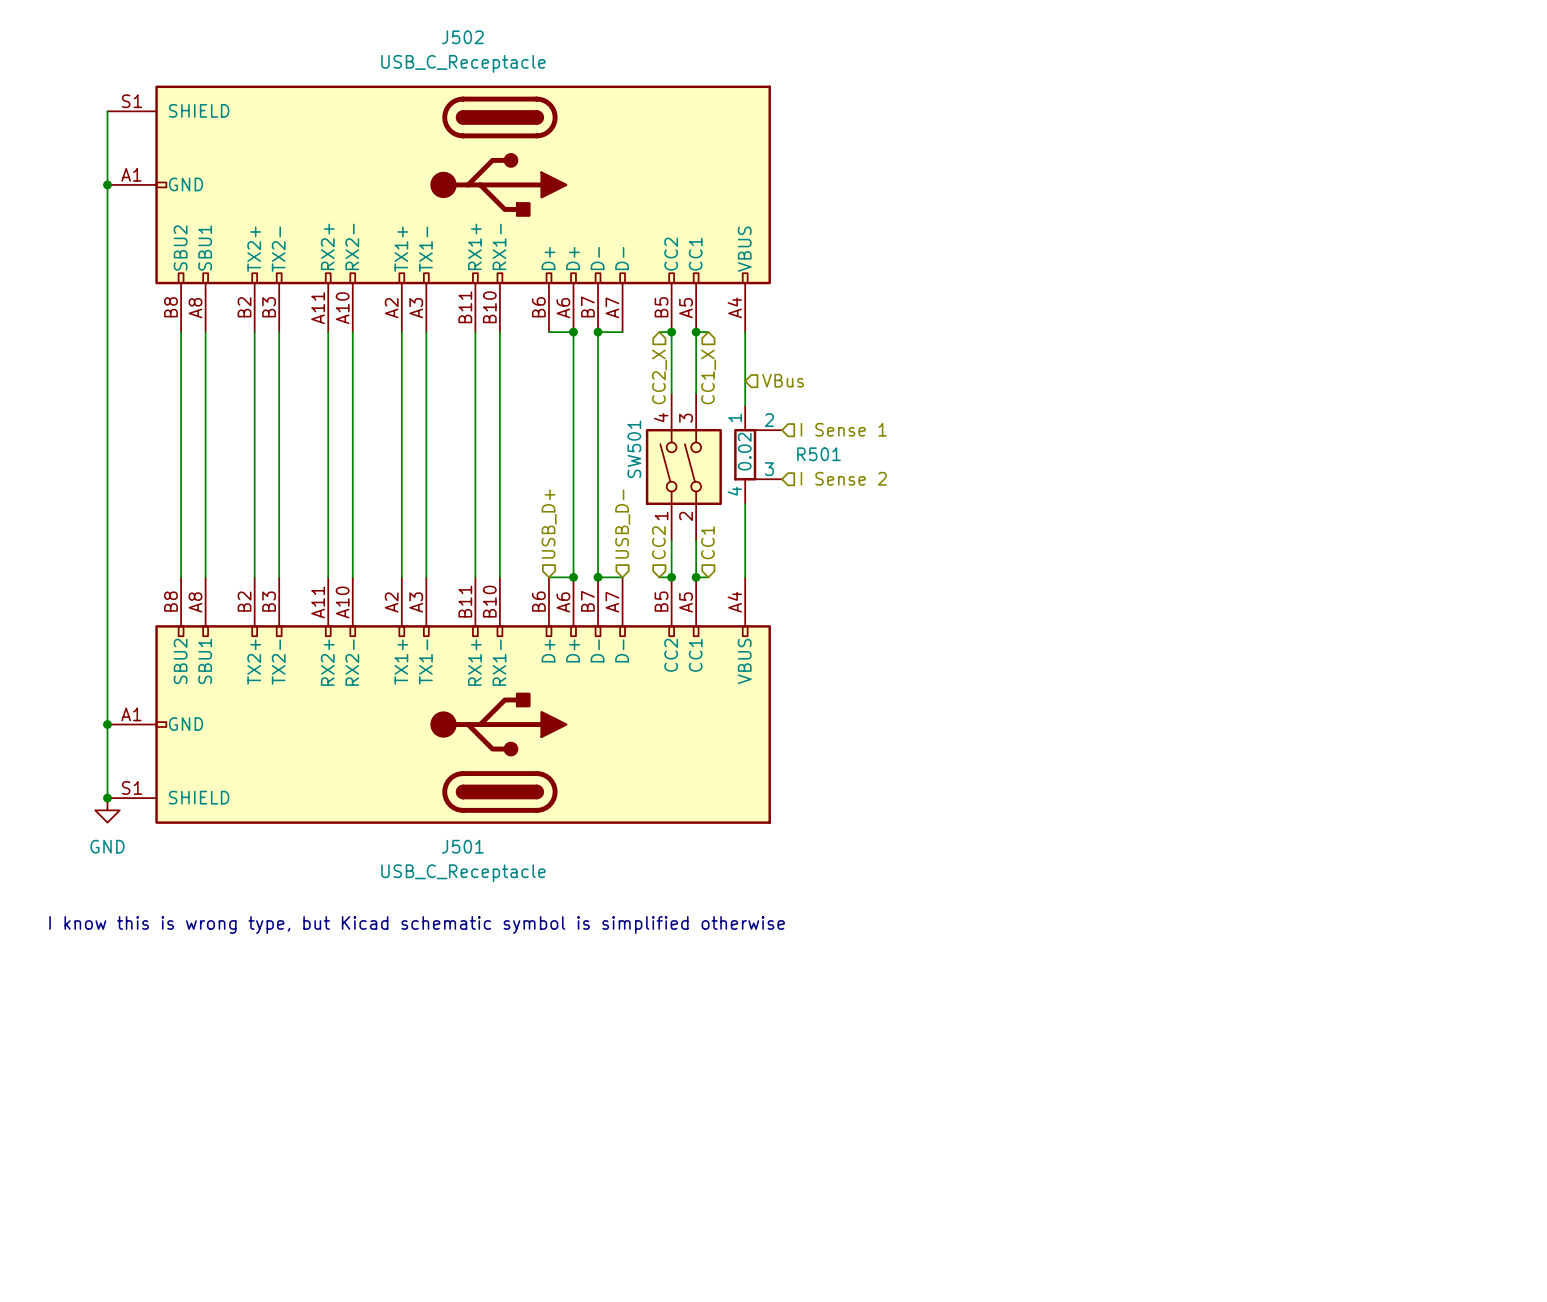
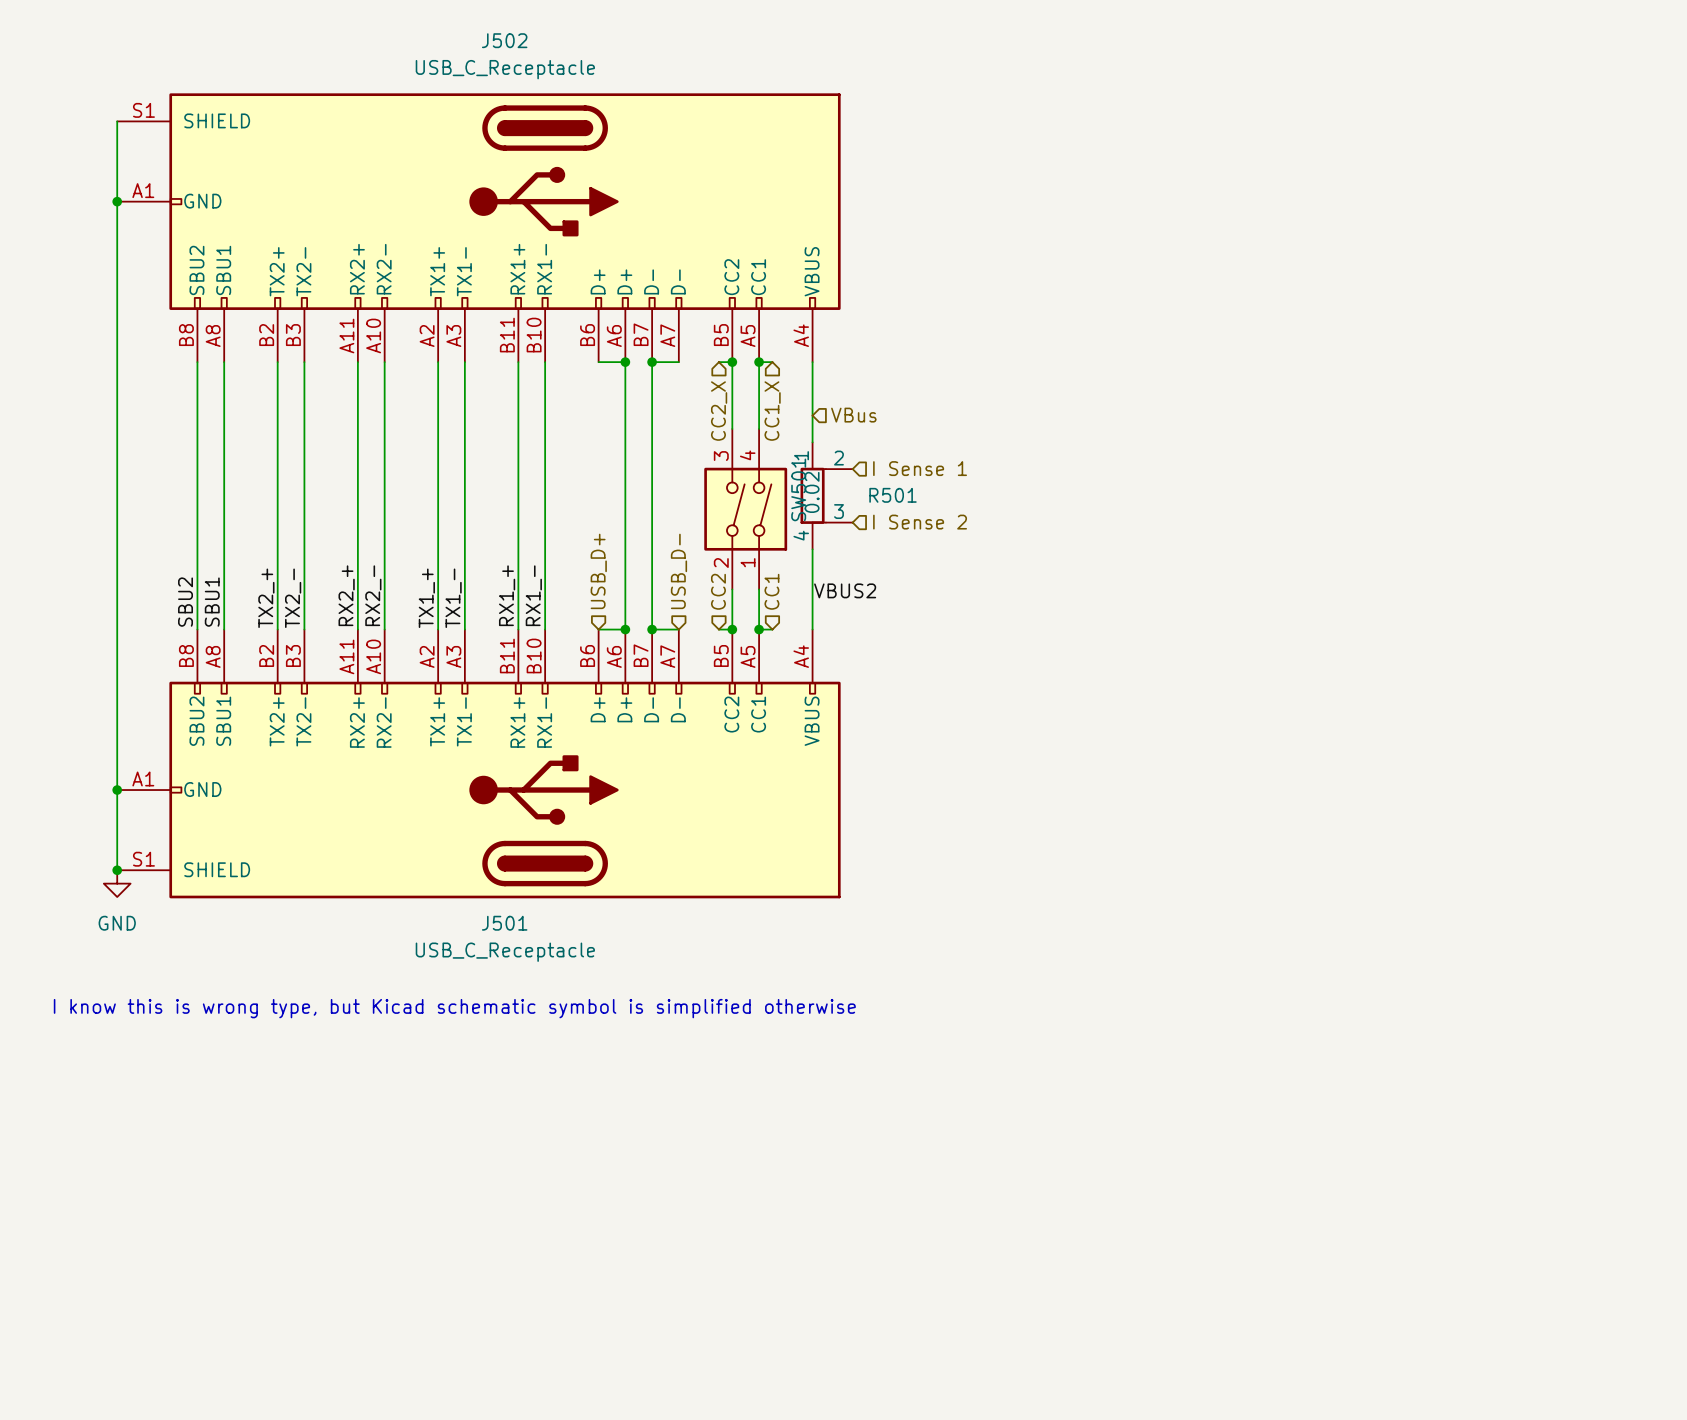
SW501 flip: as is (683, 466) -> left-right (745, 509)
label: none -> VBUS2 (845, 590)
label: none -> RX2_+ (346, 595)
label: none -> RX2_- (373, 595)
label: none -> RX1_+ (507, 595)
label: none -> RX1_- (533, 595)
label: none -> TX2_+ (266, 598)
label: none -> TX2_- (293, 598)
label: none -> TX1_+ (426, 598)
label: none -> TX1_- (453, 598)
label: none -> SBU2 (185, 602)
label: none -> SBU1 (212, 602)

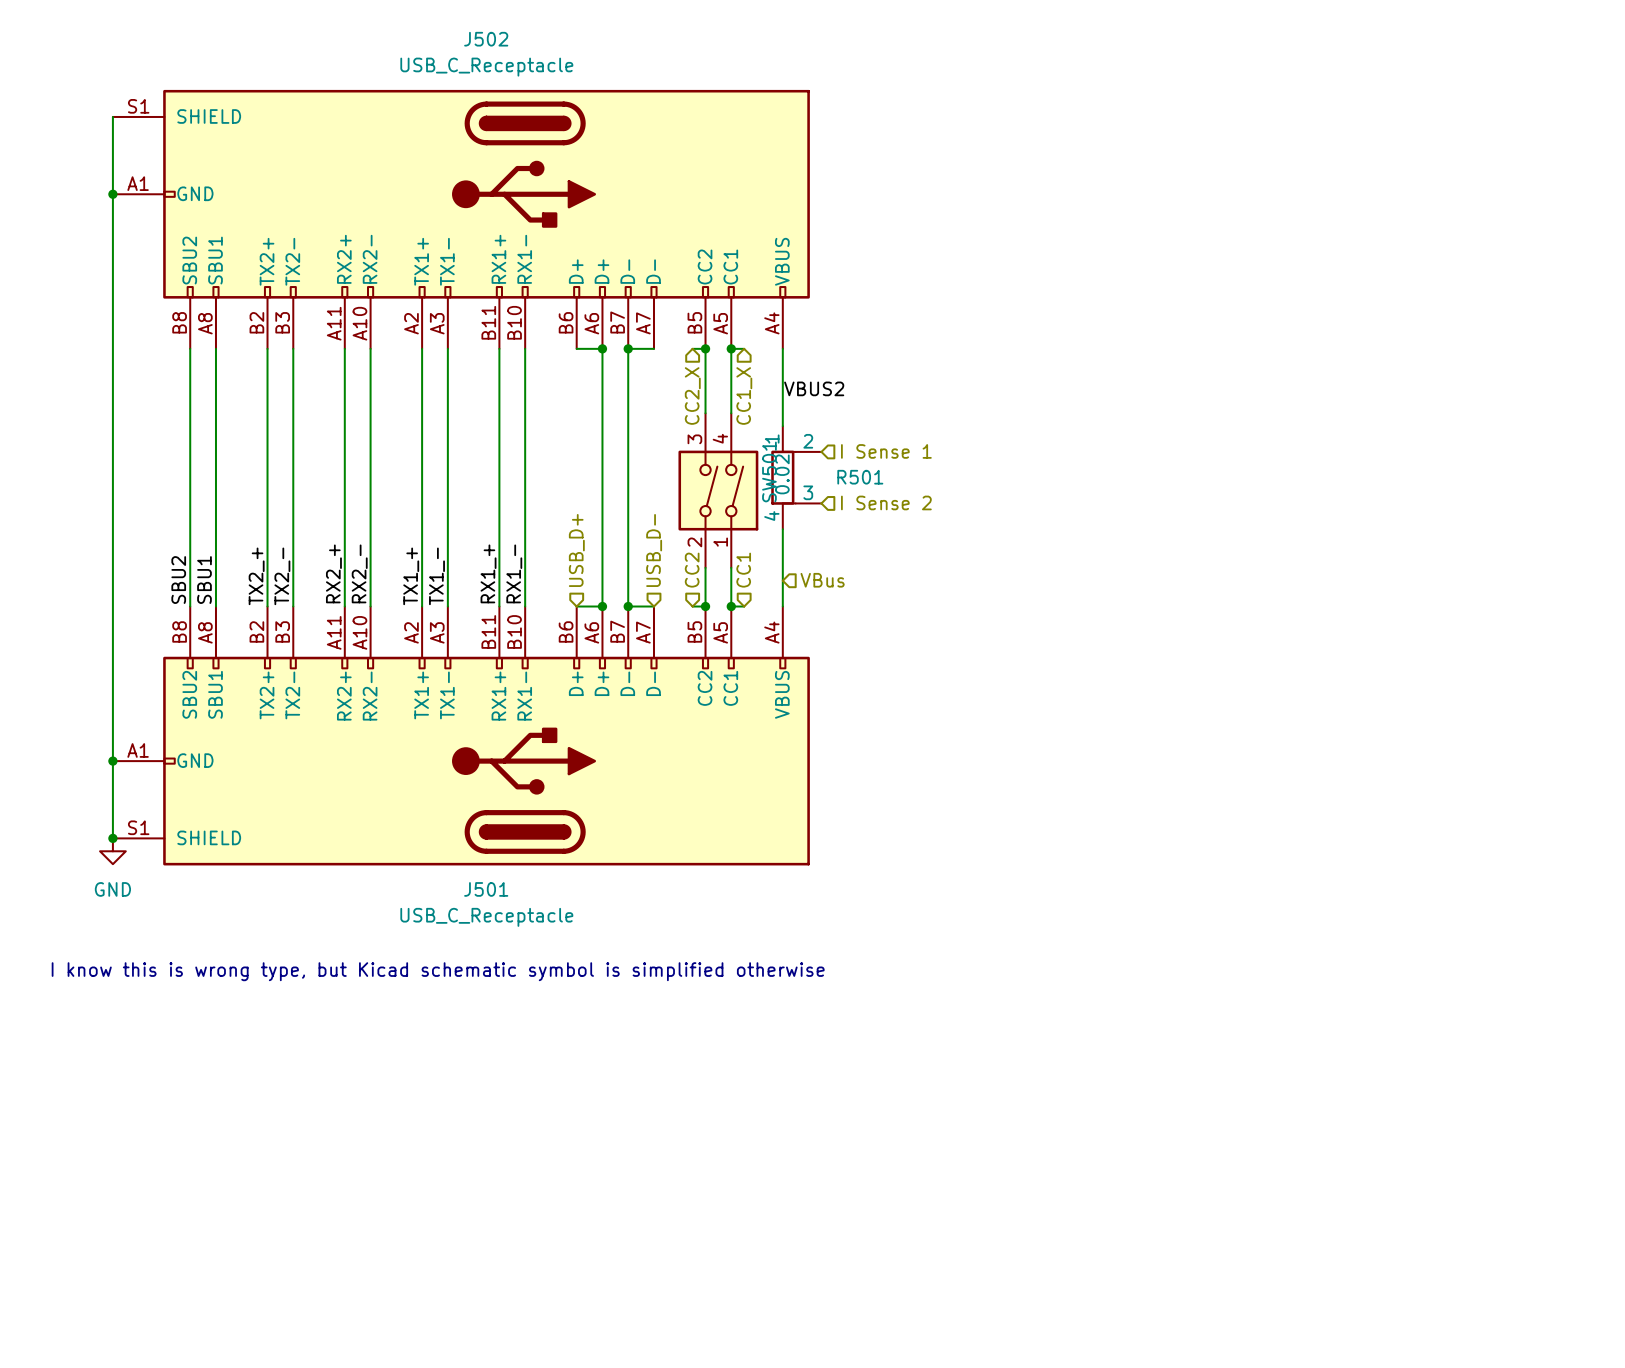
hierarchical label position: VBus (853, 415) -> VBus (822, 580)
label position: VBUS2 (845, 590) -> VBUS2 (814, 388)

